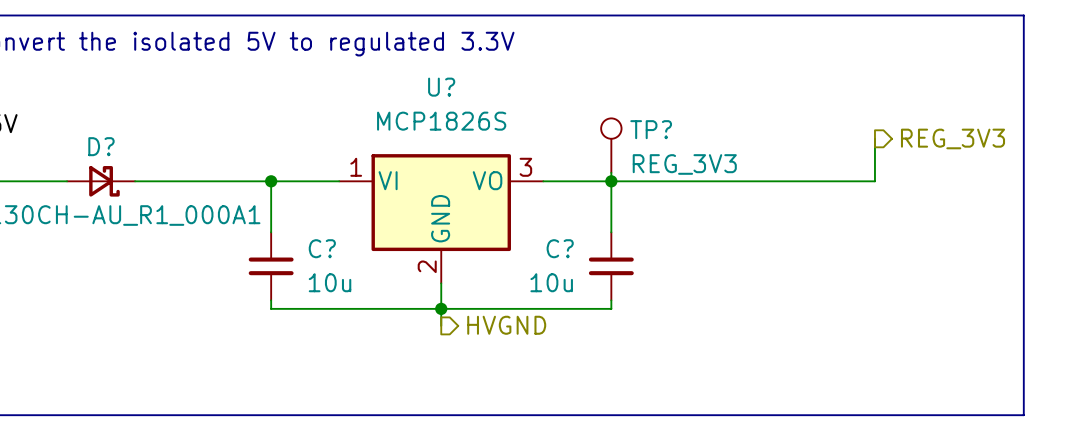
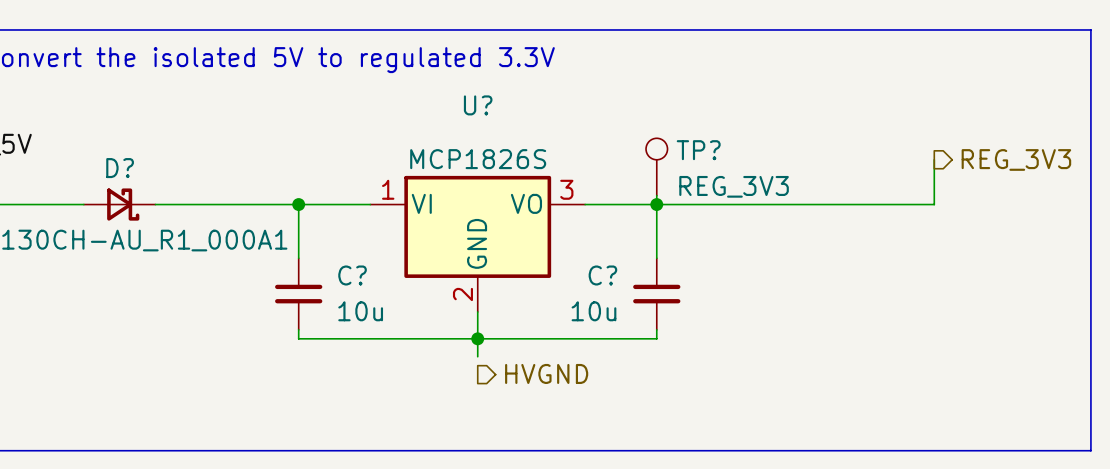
U? value position: MCP1826S (441, 121) -> MCP1826S (478, 159)
hierarchical label position: HVGND (506, 325) -> HVGND (546, 373)

